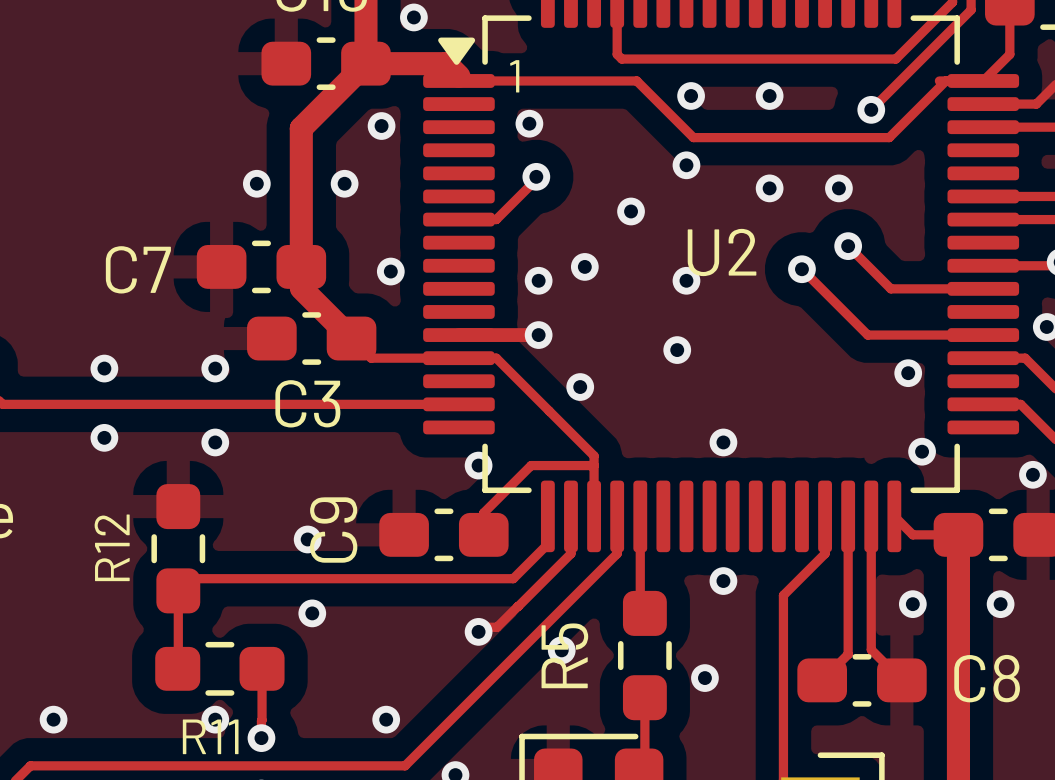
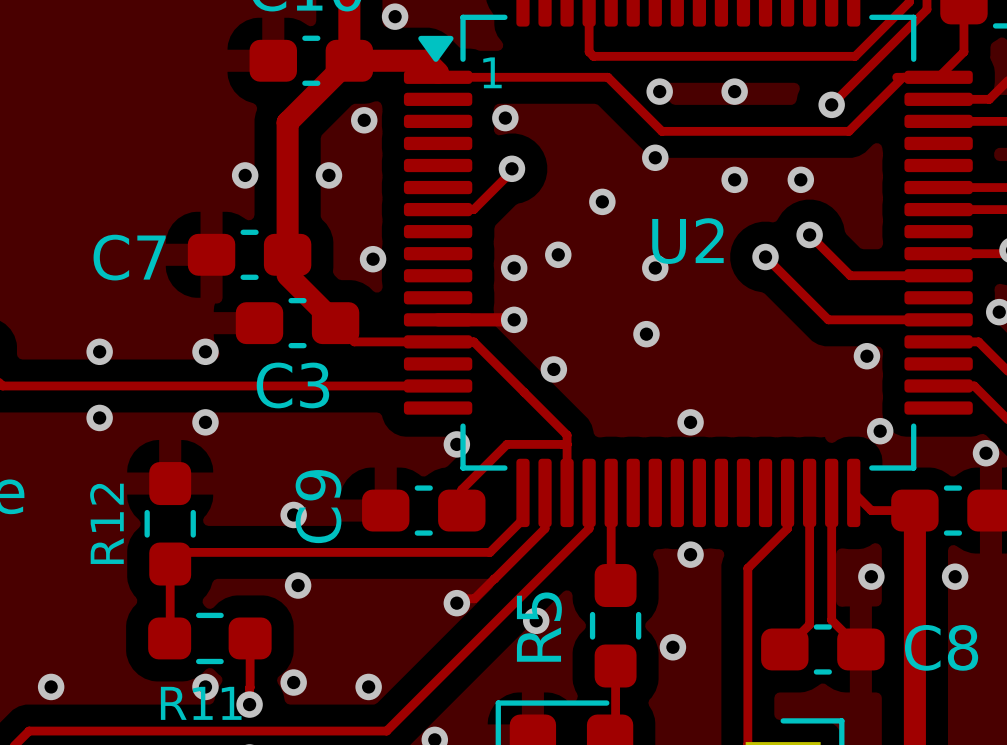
via: none -> (293, 682)

